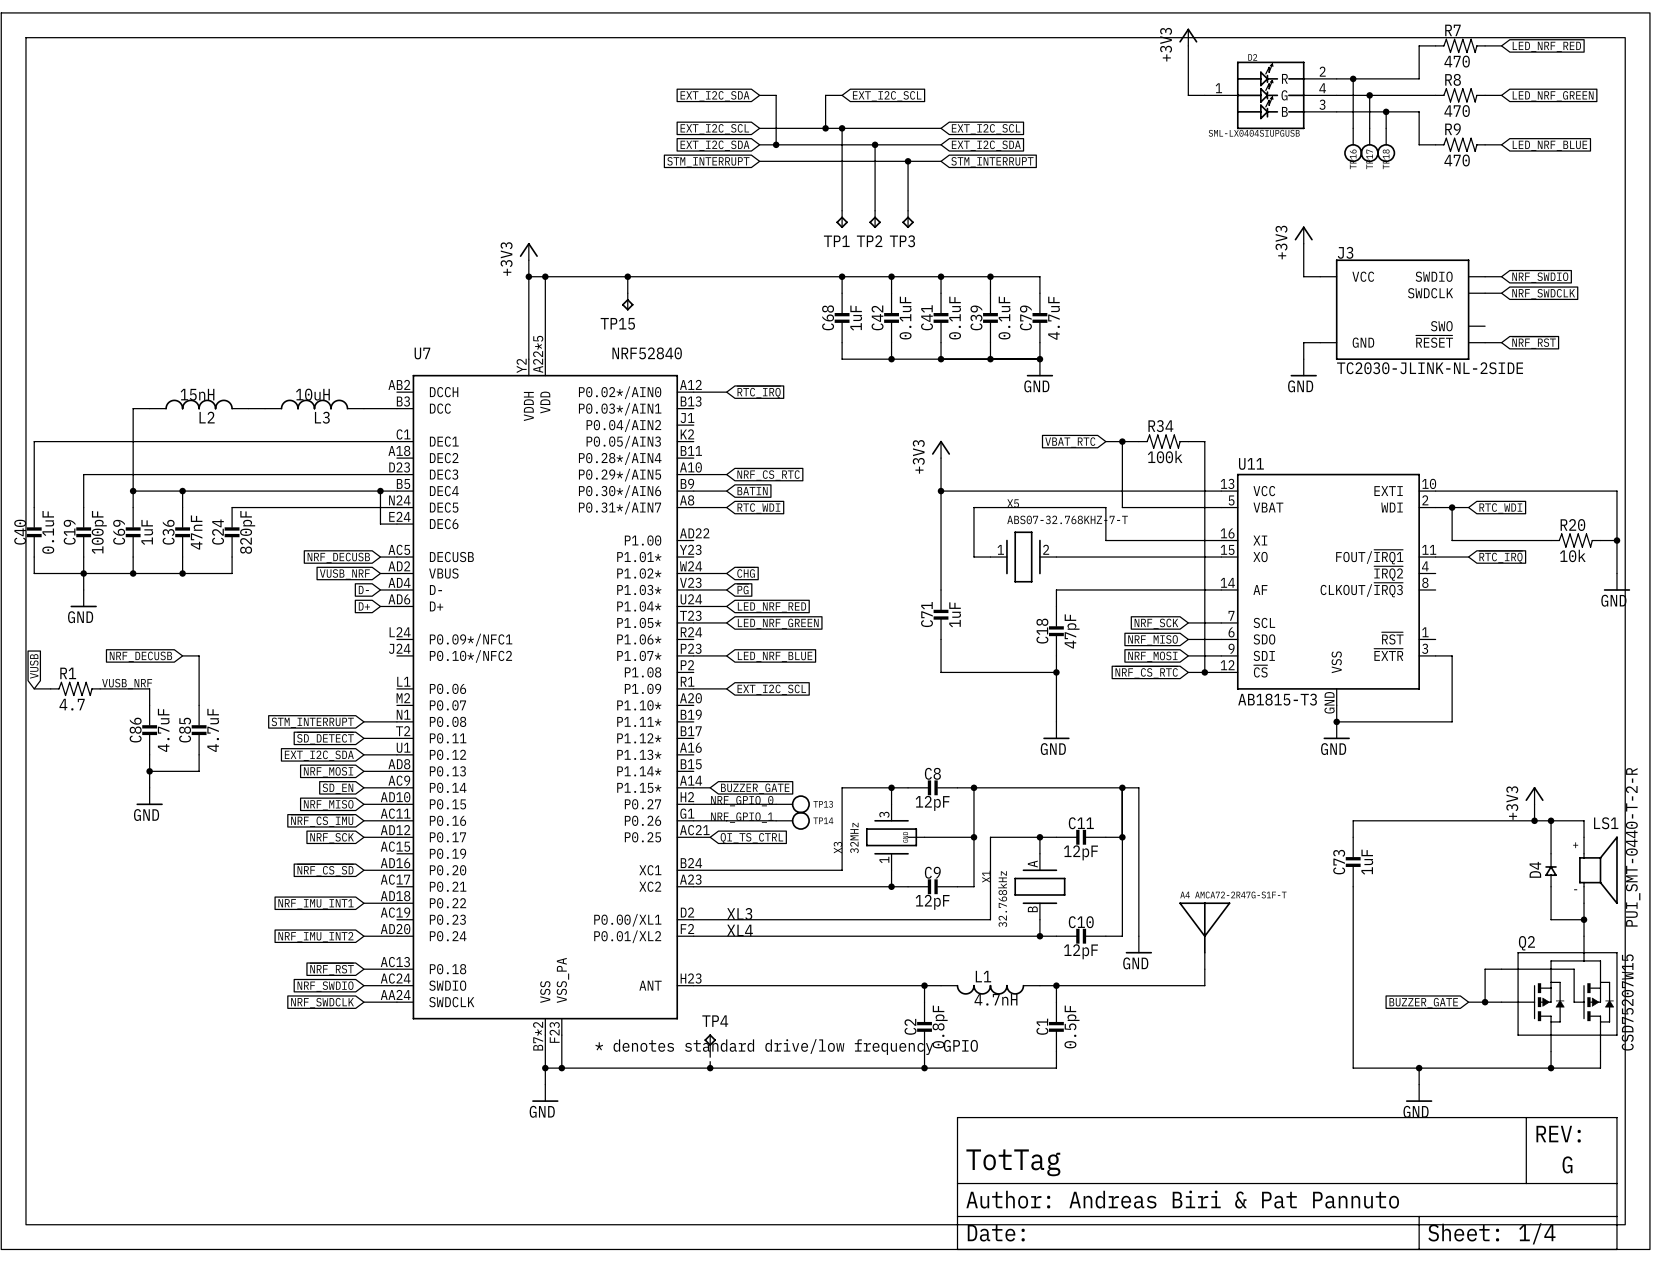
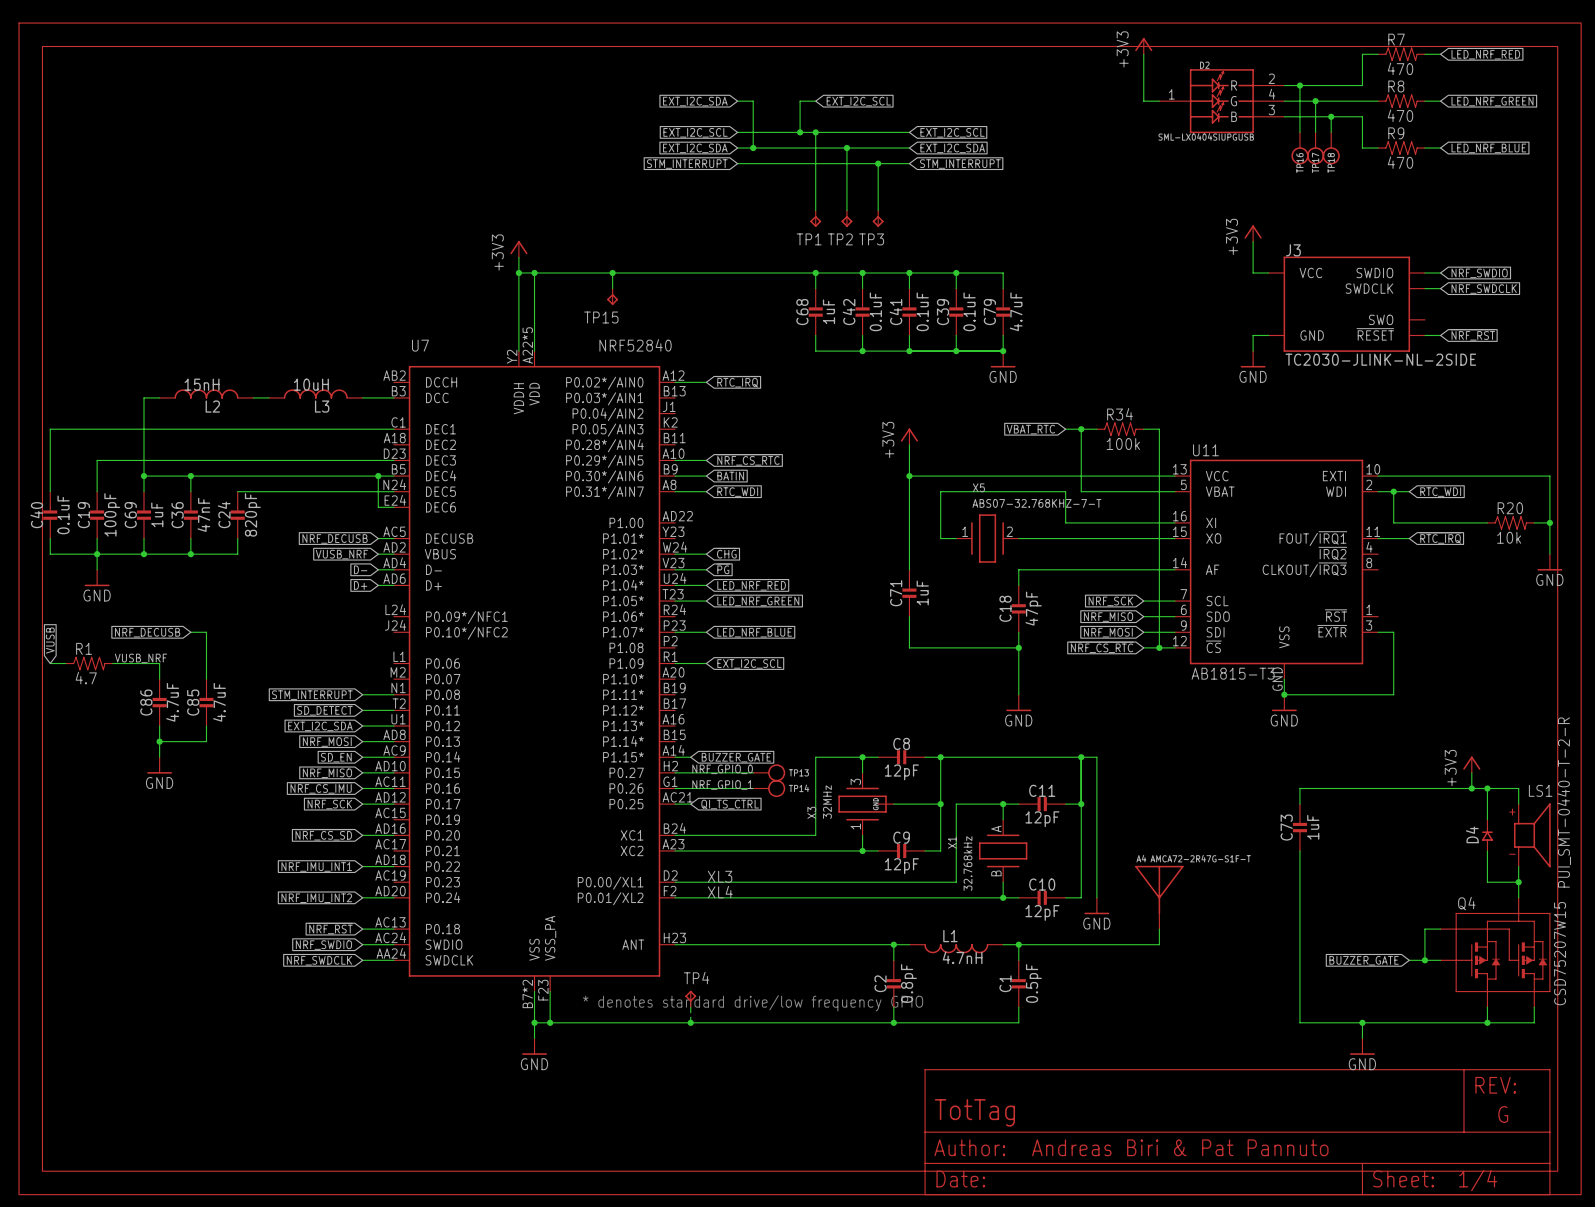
Q2 name: Q2 (1526, 943) -> Q4 (1466, 903)

